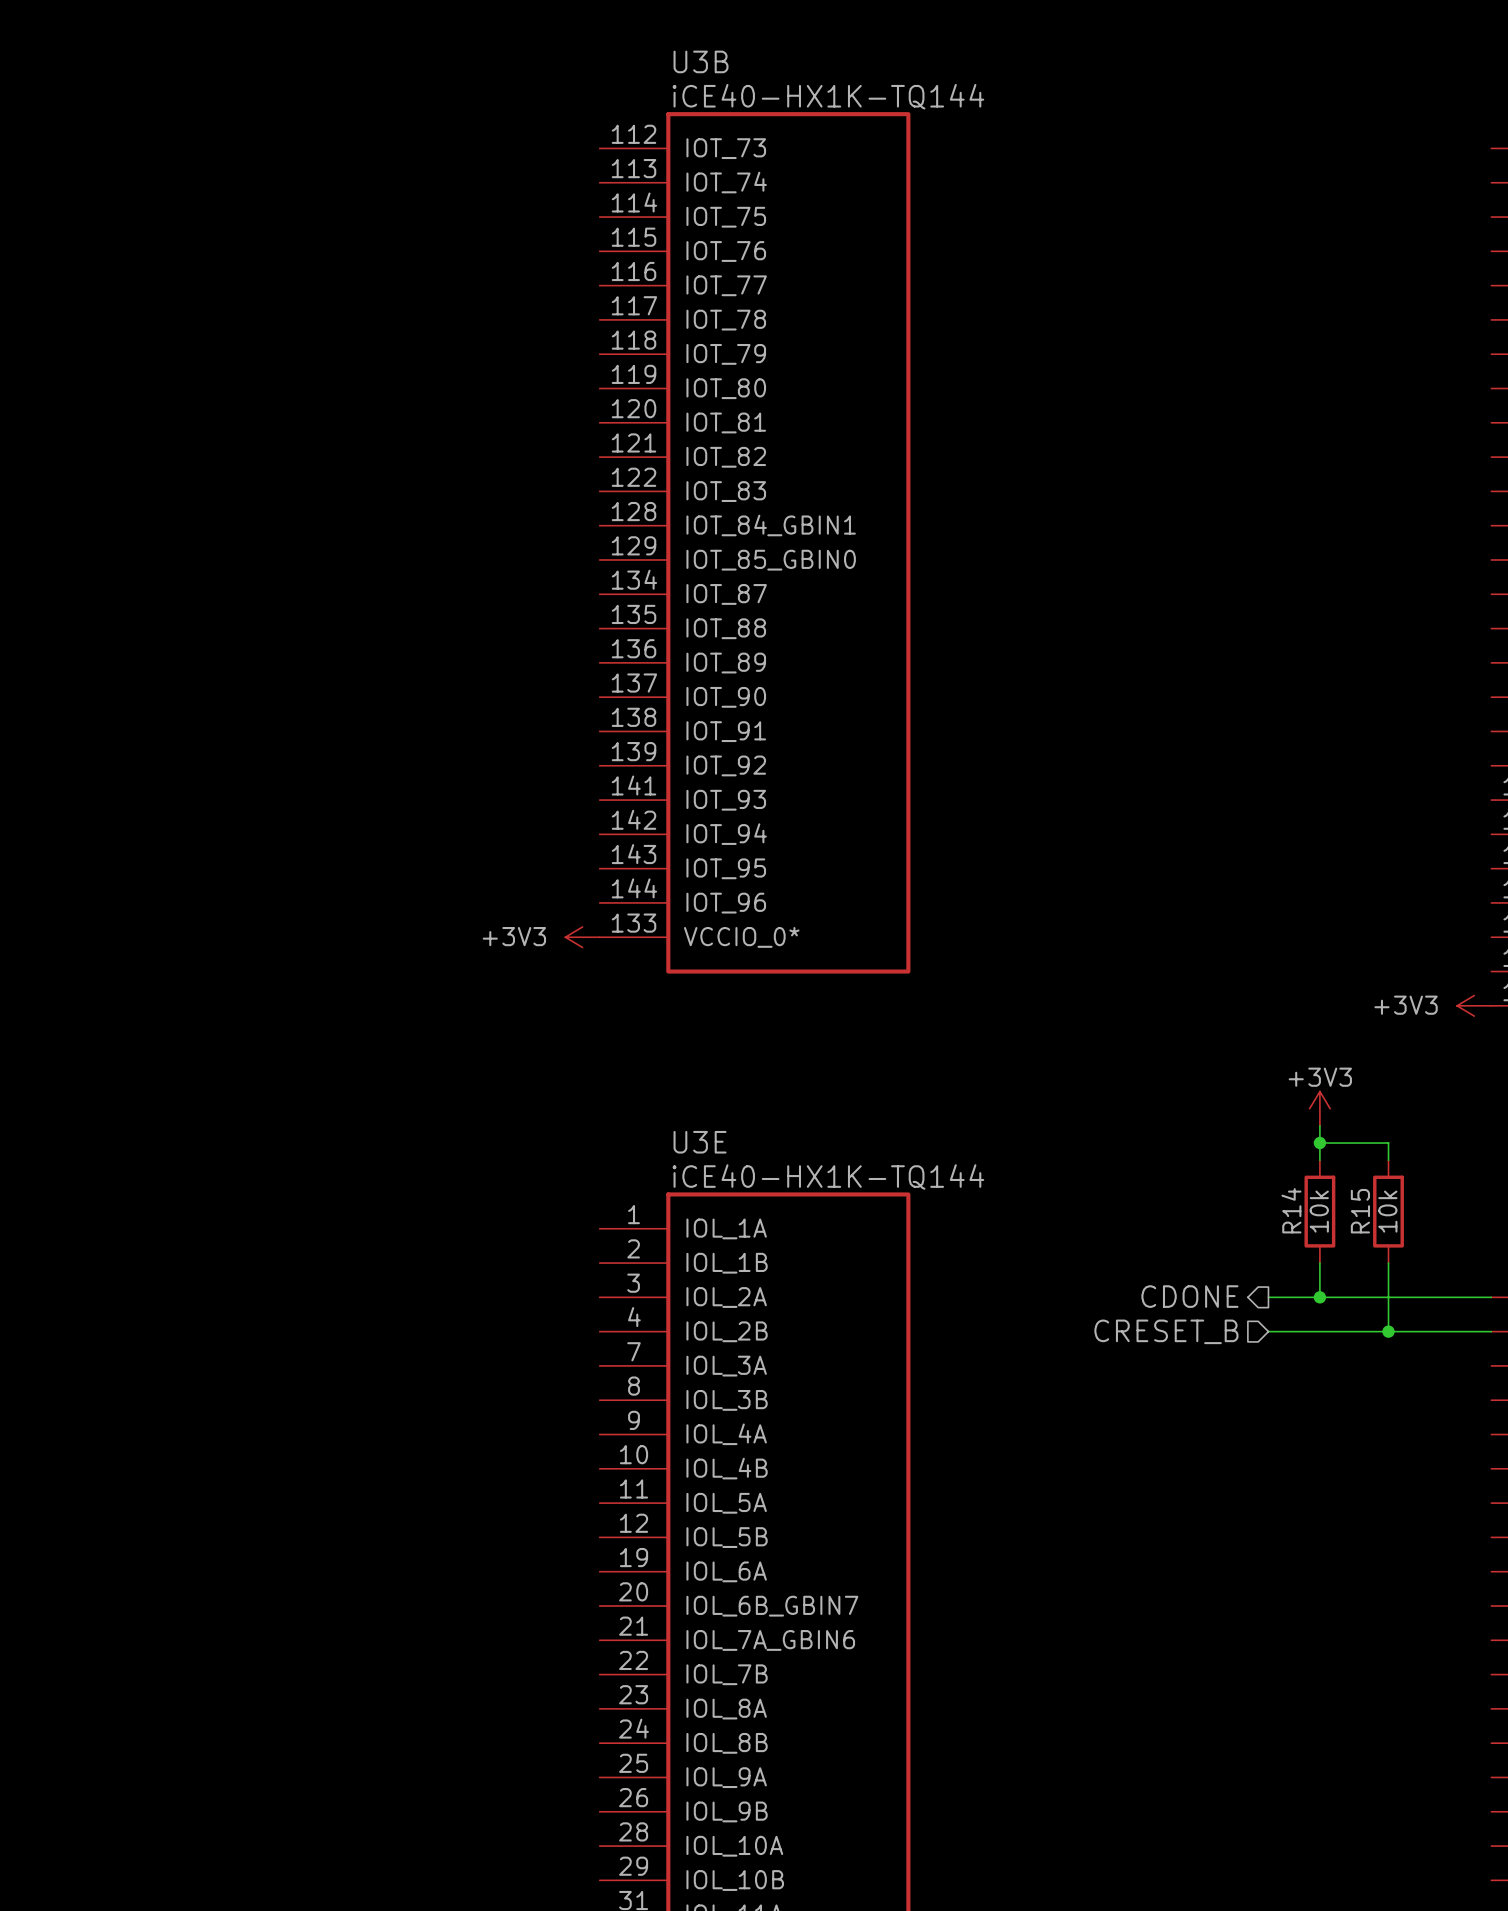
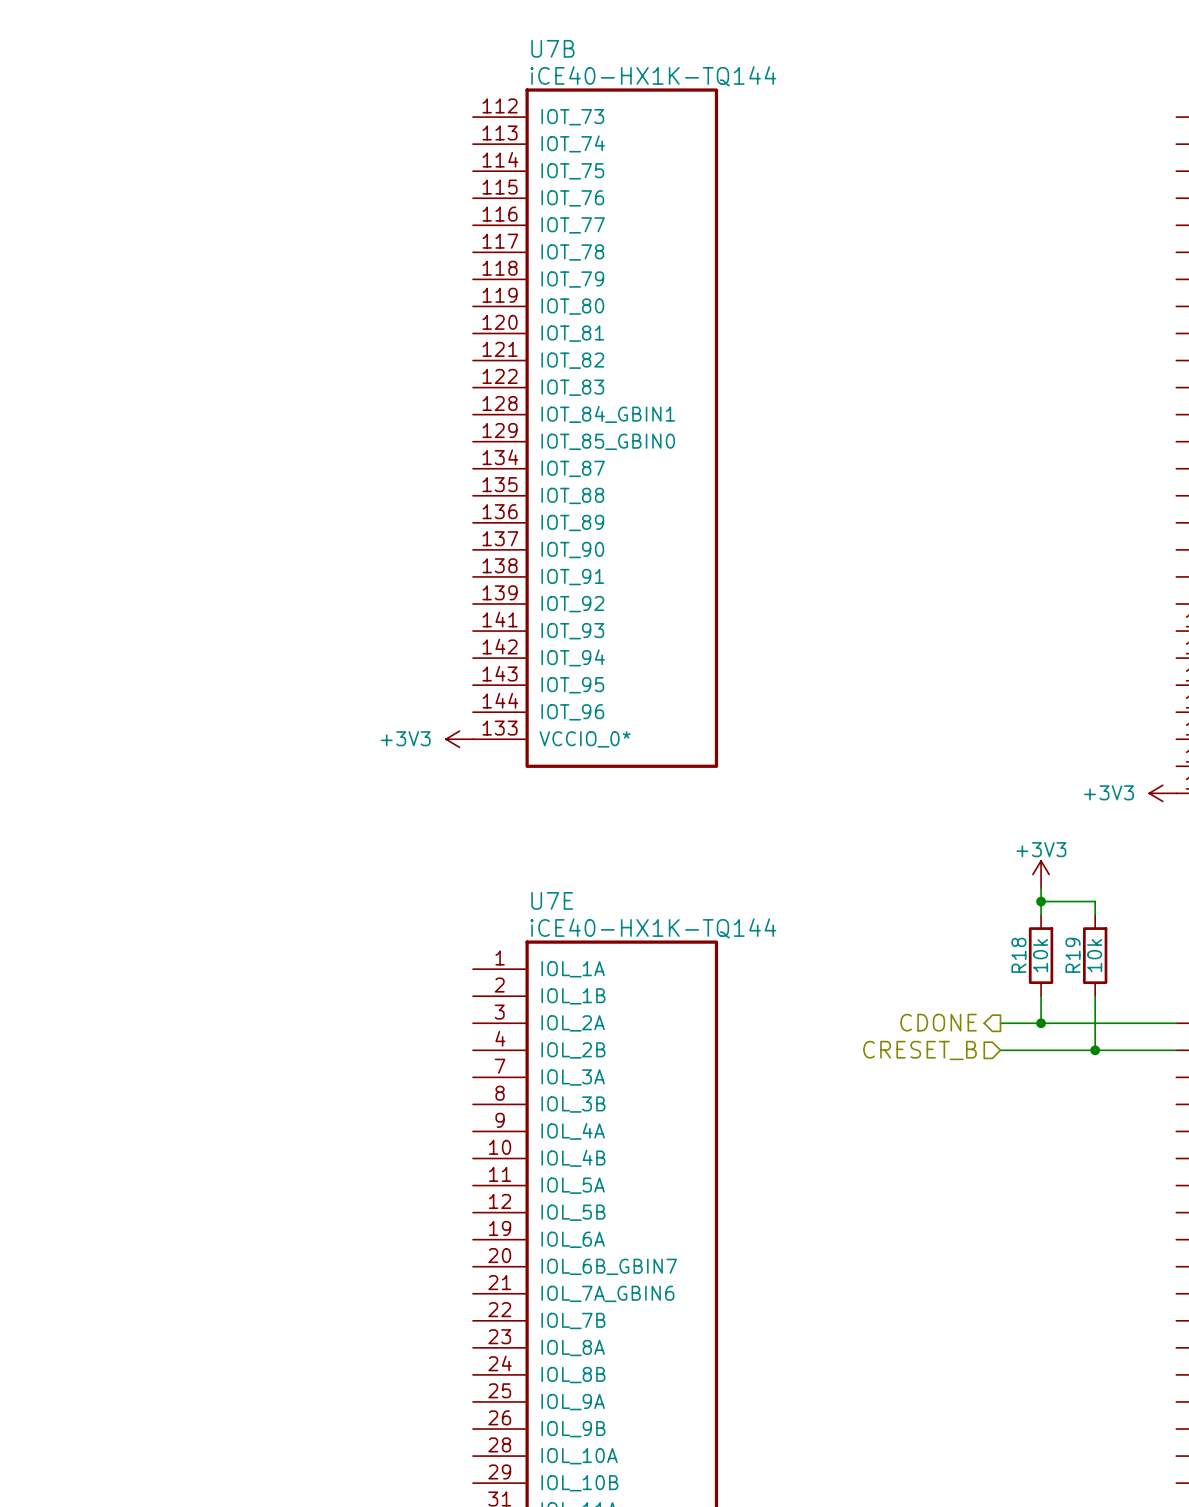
U3B name: U3B (701, 61) -> U7B (552, 48)
U3E name: U3E (700, 1142) -> U7E (552, 900)
R14 name: R14 (1291, 1210) -> R18 (1018, 955)
R15 name: R15 (1360, 1211) -> R19 (1073, 955)

